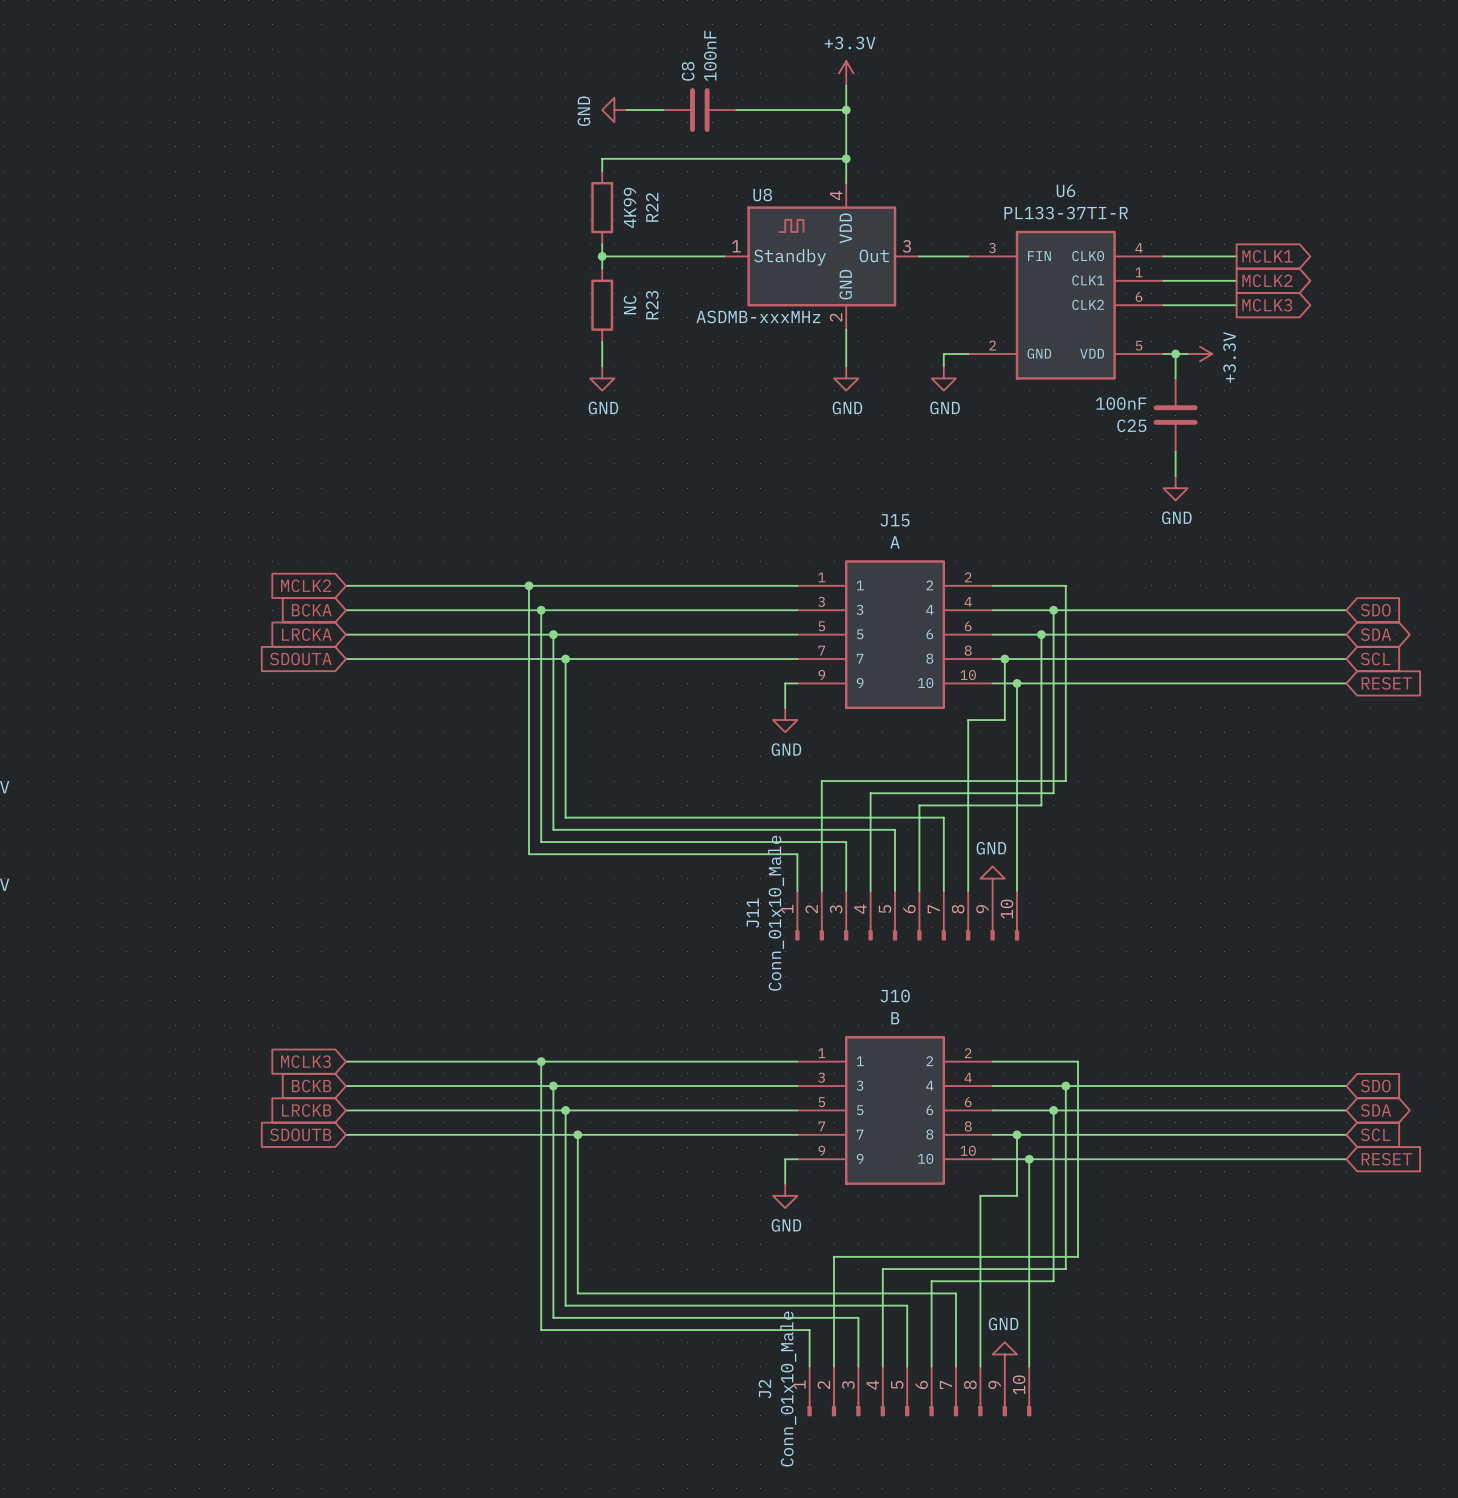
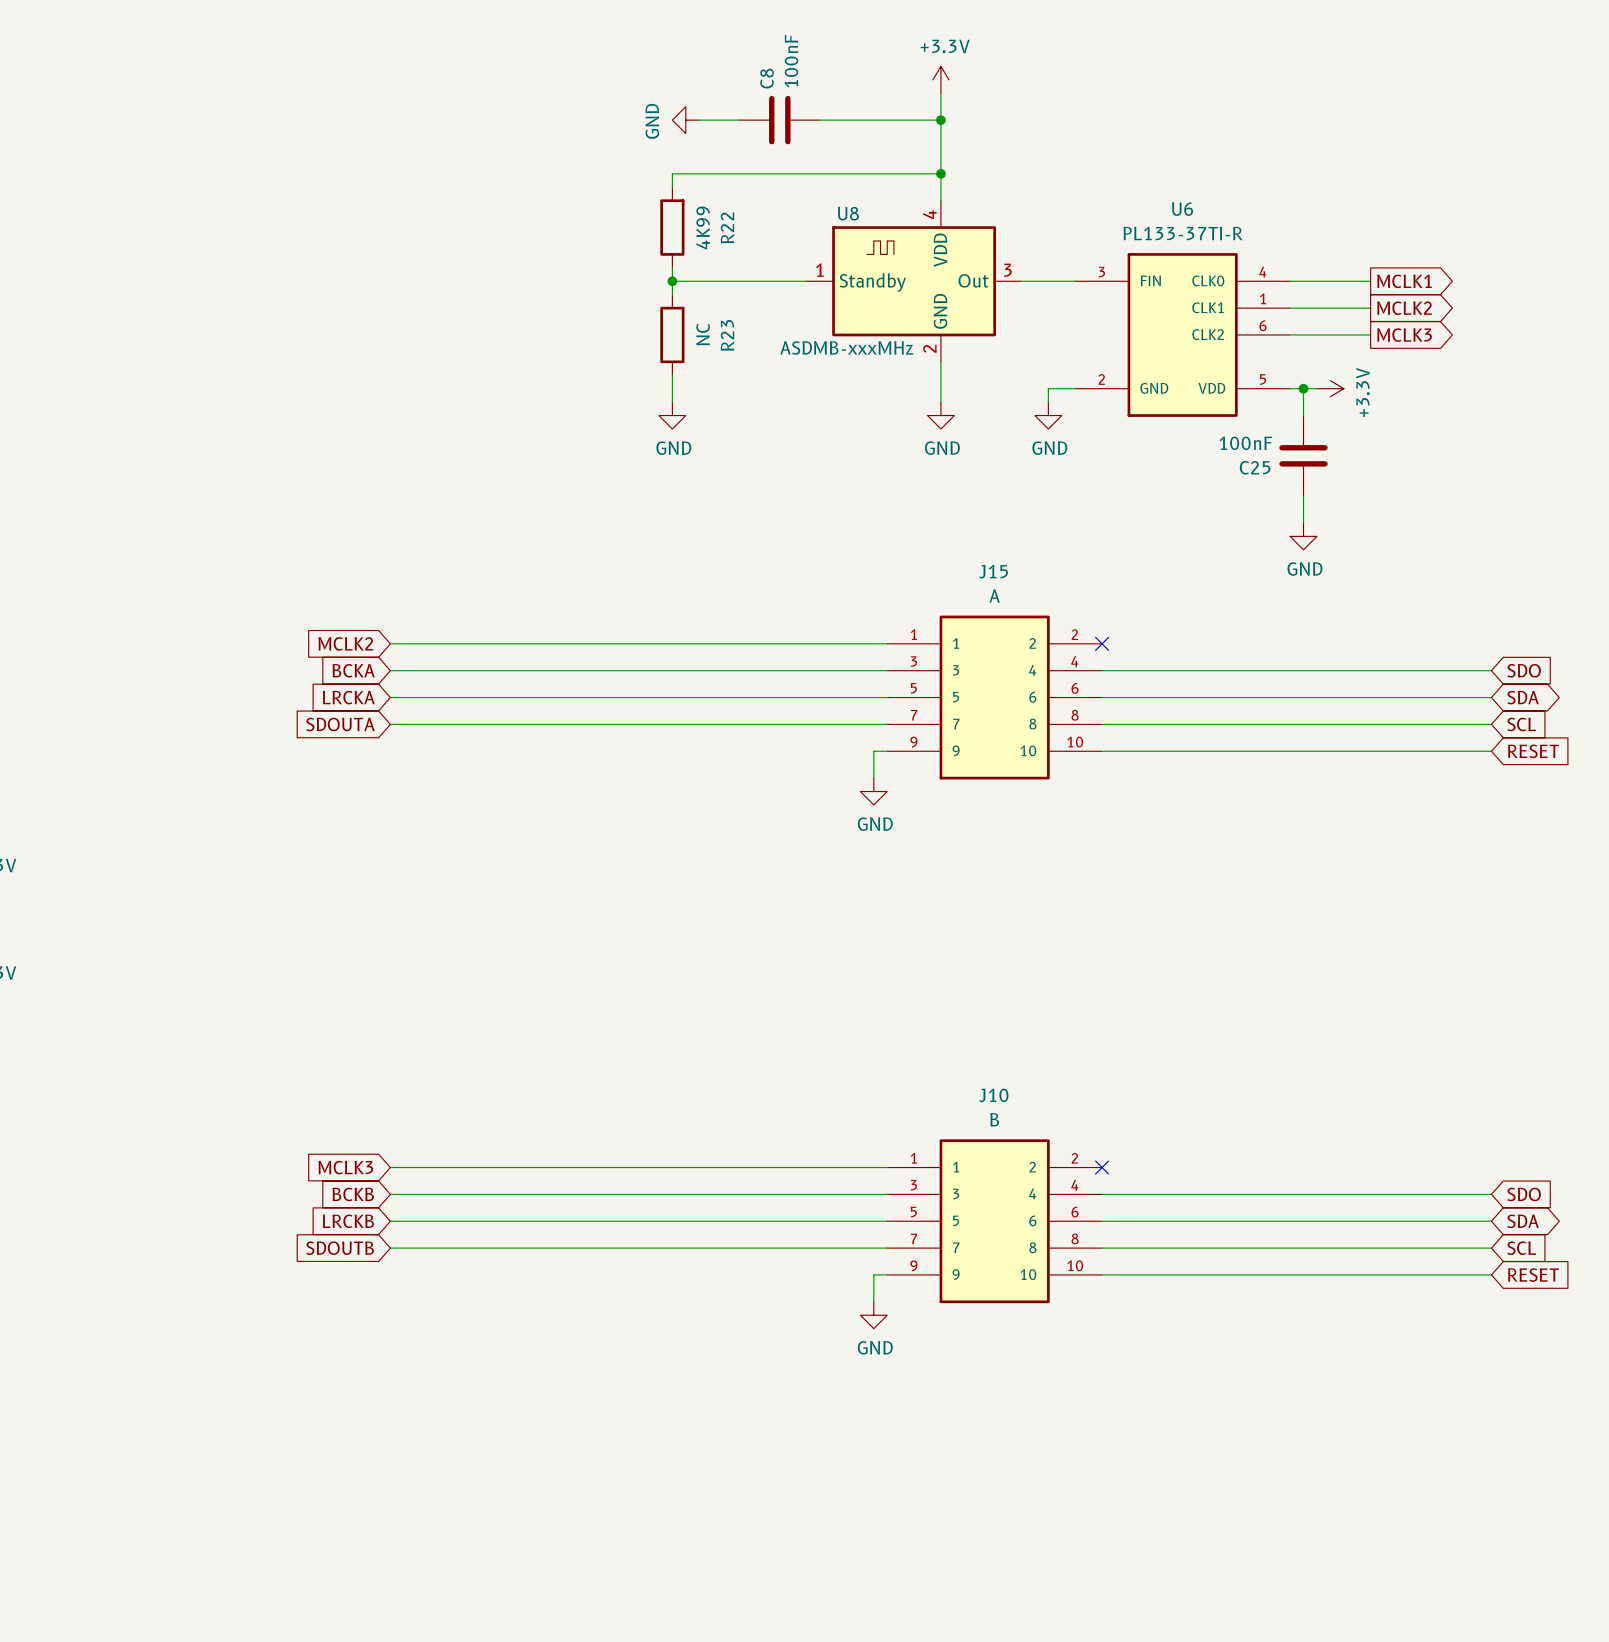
wire: (529, 585) (529, 854) (797, 854) (797, 890) -> none
junction: (529, 585) -> none
wire: (992, 585) (1065, 585) (1065, 781) (821, 781) (821, 890) -> none
no-connect mark: none -> (1102, 643)
wire: (541, 610) (541, 842) (846, 842) (846, 890) -> none
junction: (541, 610) -> none
wire: (1053, 610) (1053, 793) (870, 793) (870, 890) -> none
junction: (1053, 610) -> none
wire: (553, 634) (553, 829) (895, 829) (895, 890) -> none
junction: (553, 634) -> none
wire: (1041, 634) (1041, 805) (919, 805) (919, 890) -> none
junction: (1041, 634) -> none
wire: (565, 659) (565, 817) (943, 817) (943, 890) -> none
junction: (565, 659) -> none
wire: (1004, 659) (1004, 720) (968, 720) (968, 890) -> none
junction: (1004, 659) -> none
wire: (1017, 683) (1017, 890) -> none
junction: (1017, 683) -> none
power symbol: GND (992, 878) -> none
J11: Conn_01x10_Male (907, 915) -> none
wire: (541, 1061) (541, 1330) (809, 1330) (809, 1366) -> none
junction: (541, 1061) -> none
wire: (992, 1061) (1078, 1061) (1078, 1256) (834, 1256) (834, 1366) -> none
no-connect mark: none -> (1102, 1167)
wire: (553, 1086) (553, 1317) (858, 1317) (858, 1366) -> none
junction: (553, 1086) -> none
wire: (1065, 1086) (1065, 1269) (882, 1269) (882, 1366) -> none
junction: (1065, 1086) -> none
wire: (565, 1110) (565, 1305) (907, 1305) (907, 1366) -> none
junction: (565, 1110) -> none
wire: (1053, 1110) (1053, 1281) (931, 1281) (931, 1366) -> none
junction: (1053, 1110) -> none
wire: (577, 1134) (577, 1293) (956, 1293) (956, 1366) -> none
junction: (577, 1134) -> none
wire: (1017, 1134) (1017, 1195) (980, 1195) (980, 1366) -> none
junction: (1017, 1134) -> none
wire: (1029, 1159) (1029, 1366) -> none
junction: (1029, 1159) -> none
power symbol: GND (1004, 1354) -> none
J2: Conn_01x10_Male (919, 1391) -> none

